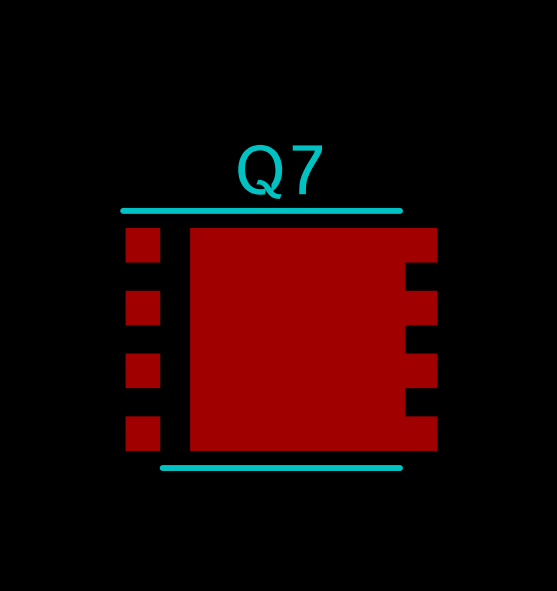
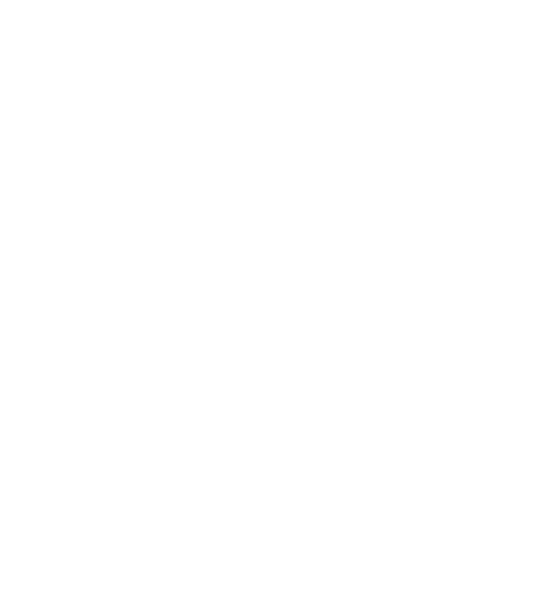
Q7: (278, 339) -> none

